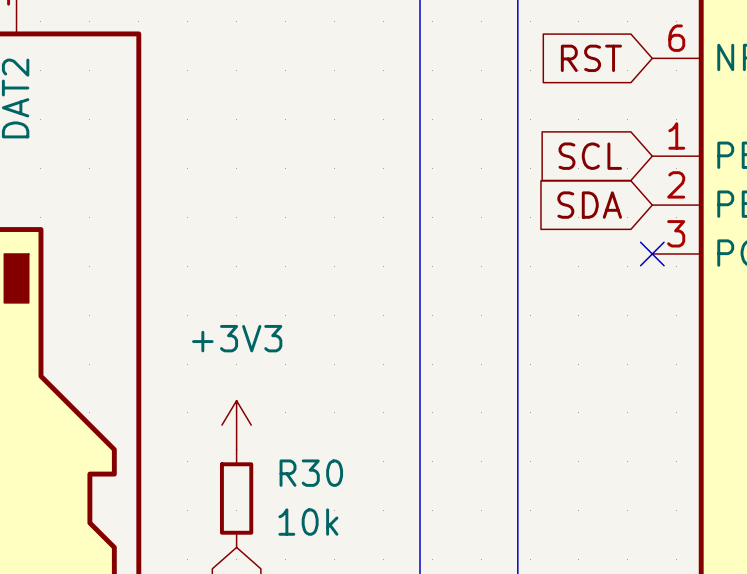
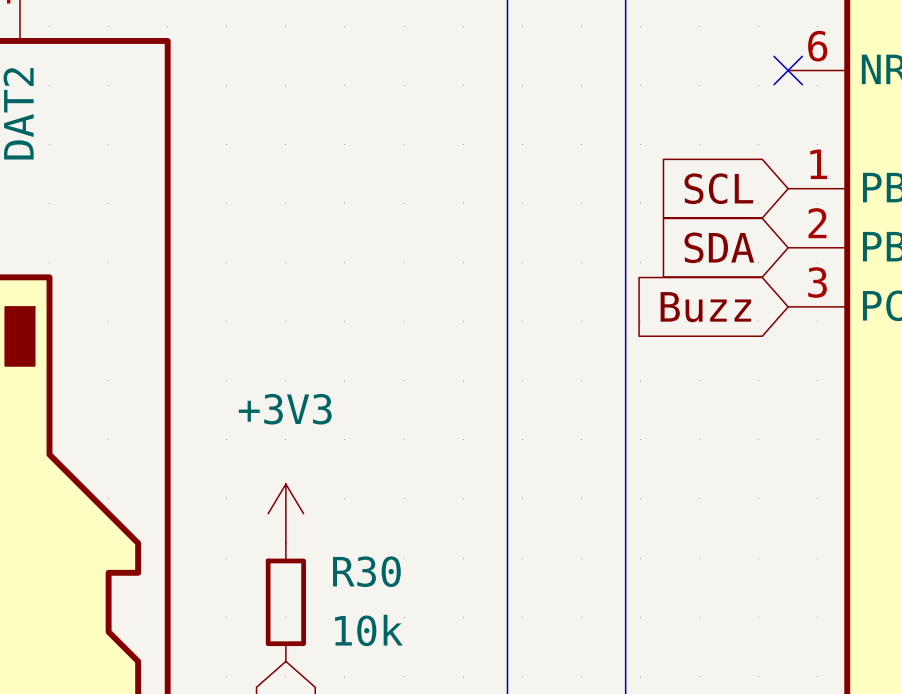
global label: RST (591, 58) -> none
no-connect mark: none -> (788, 70)
global label: none -> Buzz (705, 307)
no-connect mark: (652, 253) -> none

